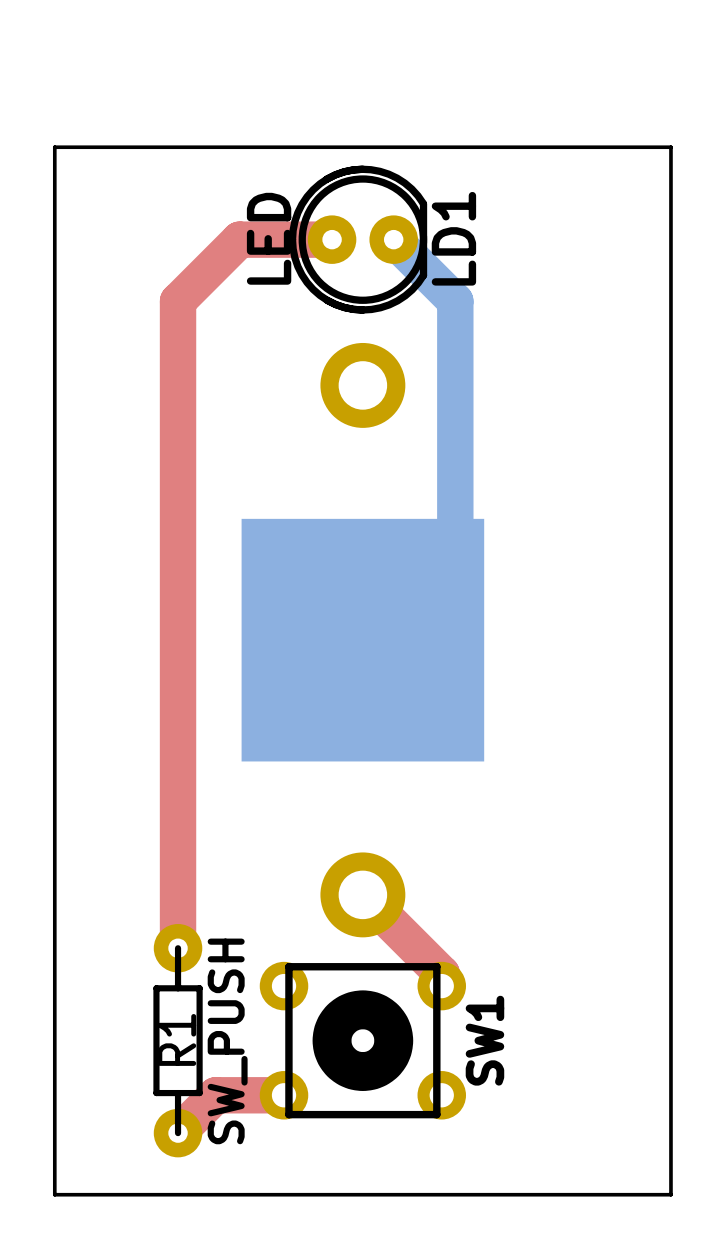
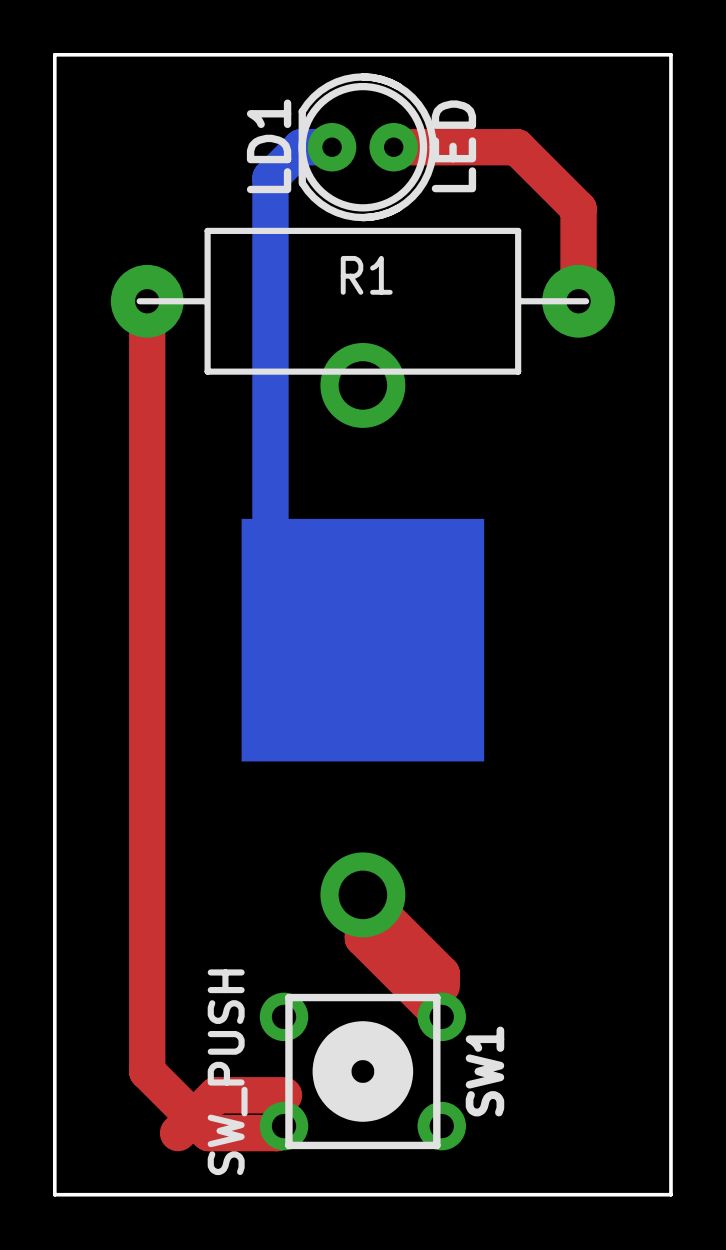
board edge: (54, 147) (670, 147) -> (54, 147) (54, 54) (670, 54) (670, 147)
bottom track: none -> (332, 147) (301, 147) (270, 178) (270, 578) (362, 670)
top track: none -> (393, 147) (516, 147) (578, 208) (578, 301)
top track: (332, 239) (239, 239) (178, 301) (178, 948) -> none
LD1 rotation: 0° (358, 239) -> 180° (367, 147)
LD1 position: (358, 239) -> (367, 147)
bottom track: (393, 239) (455, 301) (455, 547) (362, 640) -> none
top track: none -> (147, 301) (147, 1071) (208, 1133) (276, 1133) (284, 1126)
R1 footprint: [153, 924, 203, 1158] -> [110, 227, 615, 375]
top track: none -> (362, 925) (362, 938) (441, 1016)
SW1 position: (362, 1040) -> (362, 1071)

